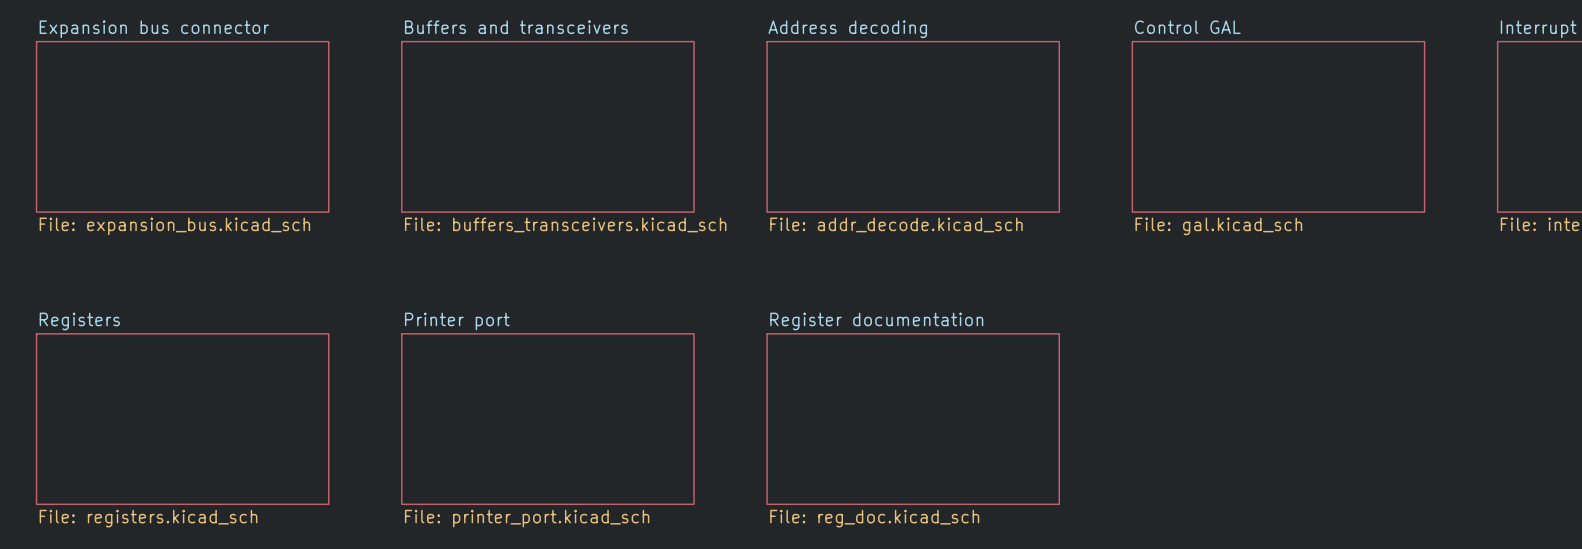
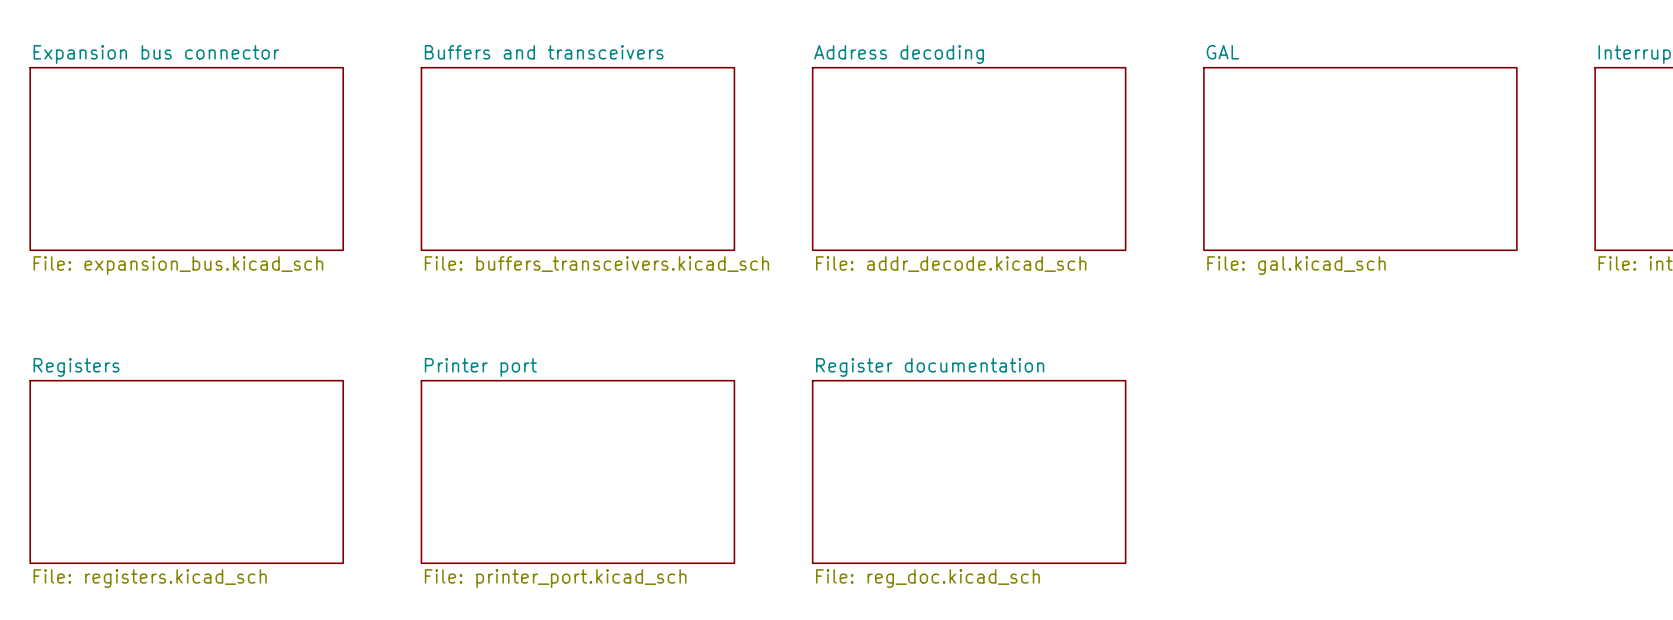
sheet Control GAL name: Control GAL (1187, 27) -> GAL (1222, 52)

